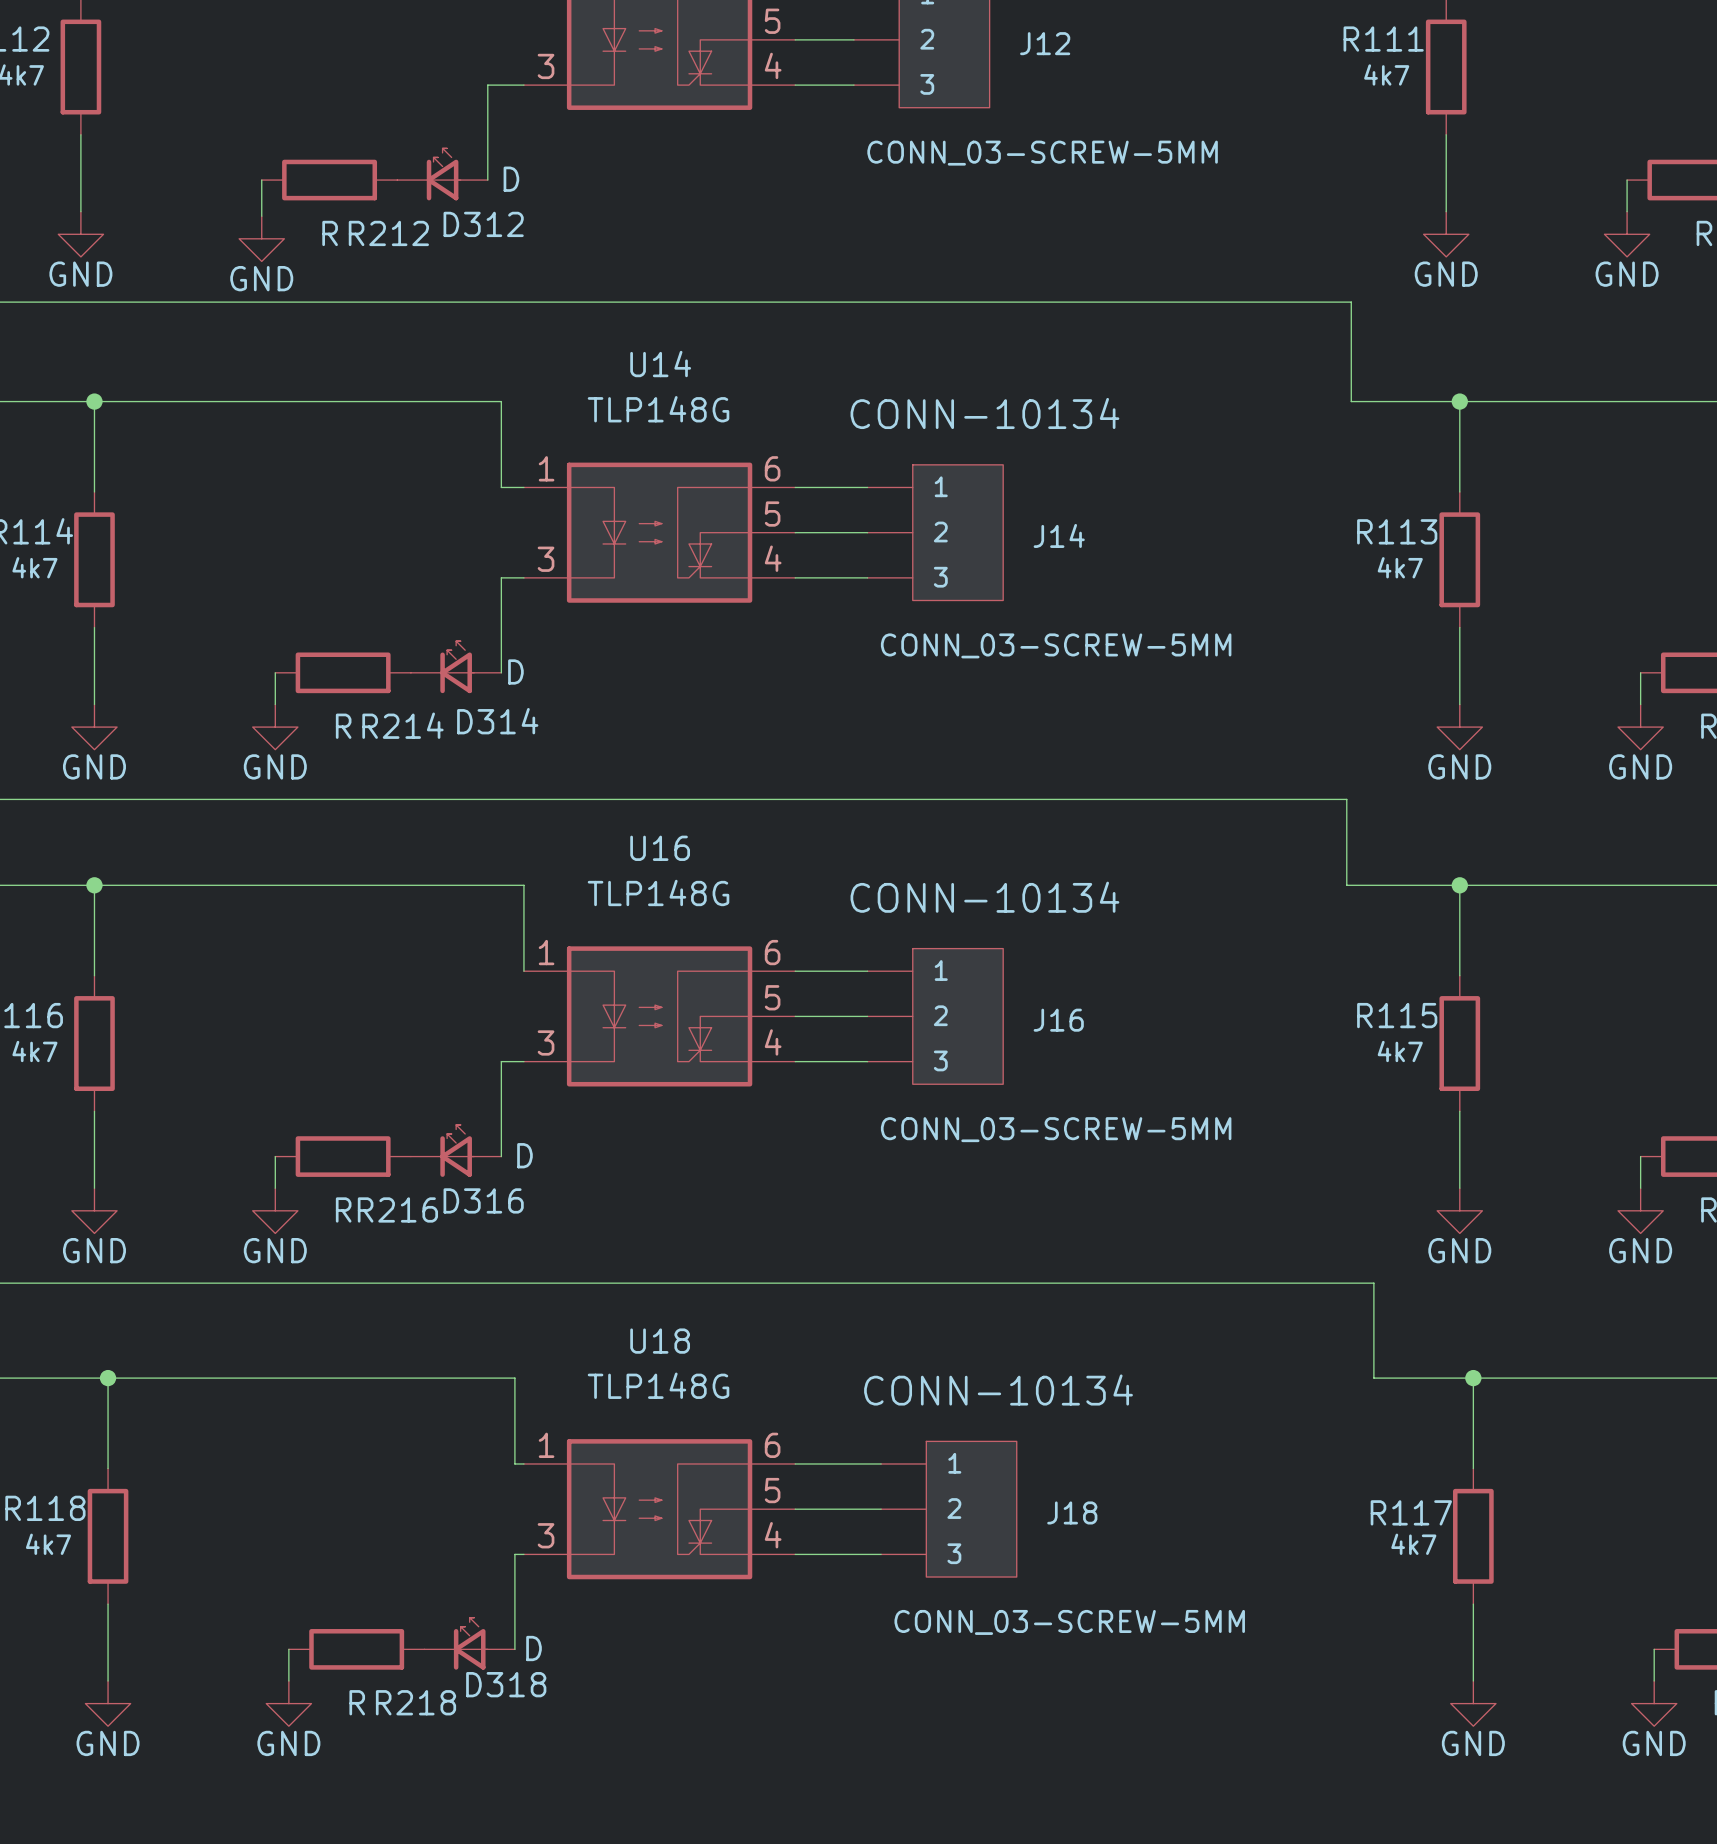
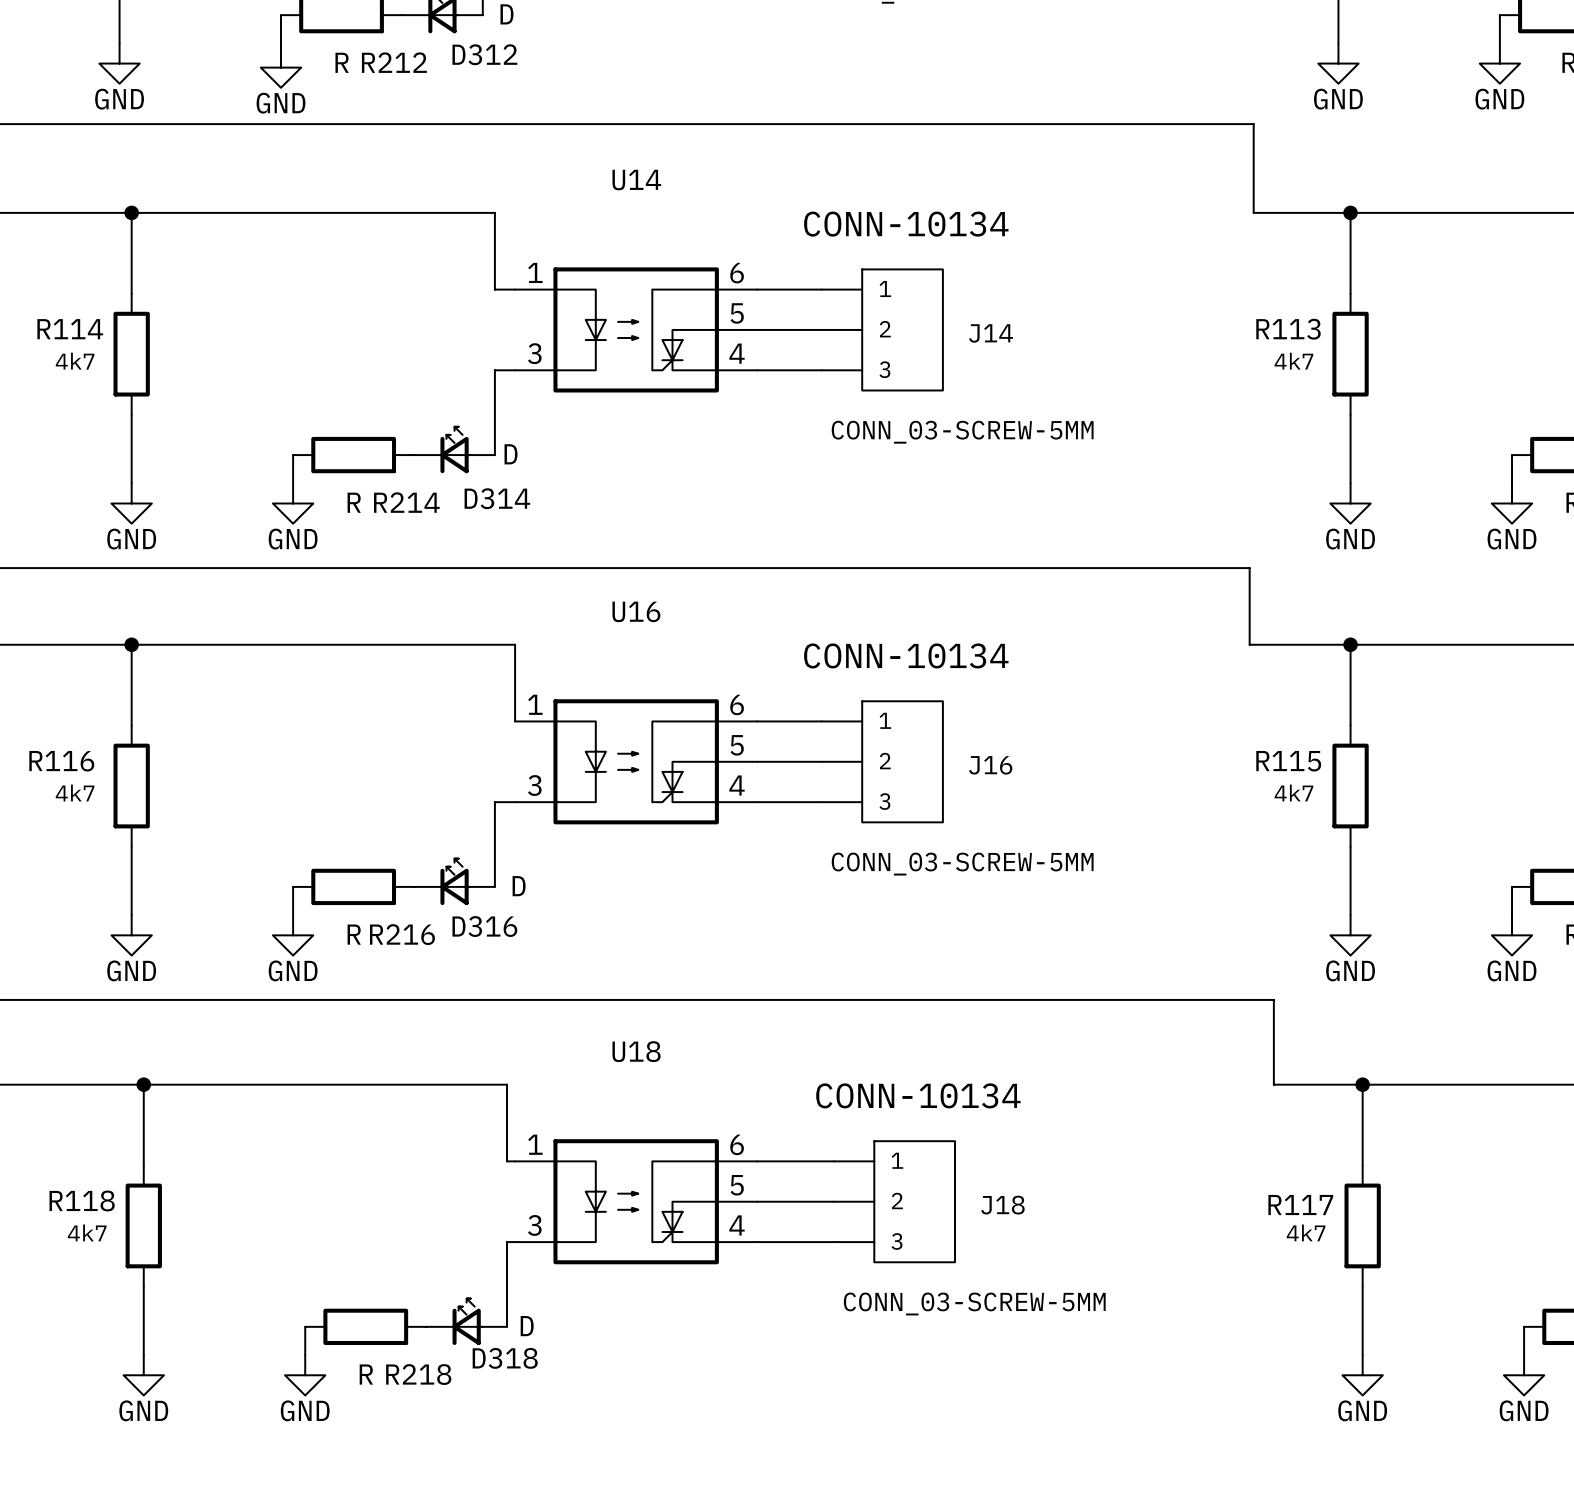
U14 value: TLP148G (658, 409) -> none
U16 value: TLP148G (658, 892) -> none
U18 value: TLP148G (658, 1385) -> none

